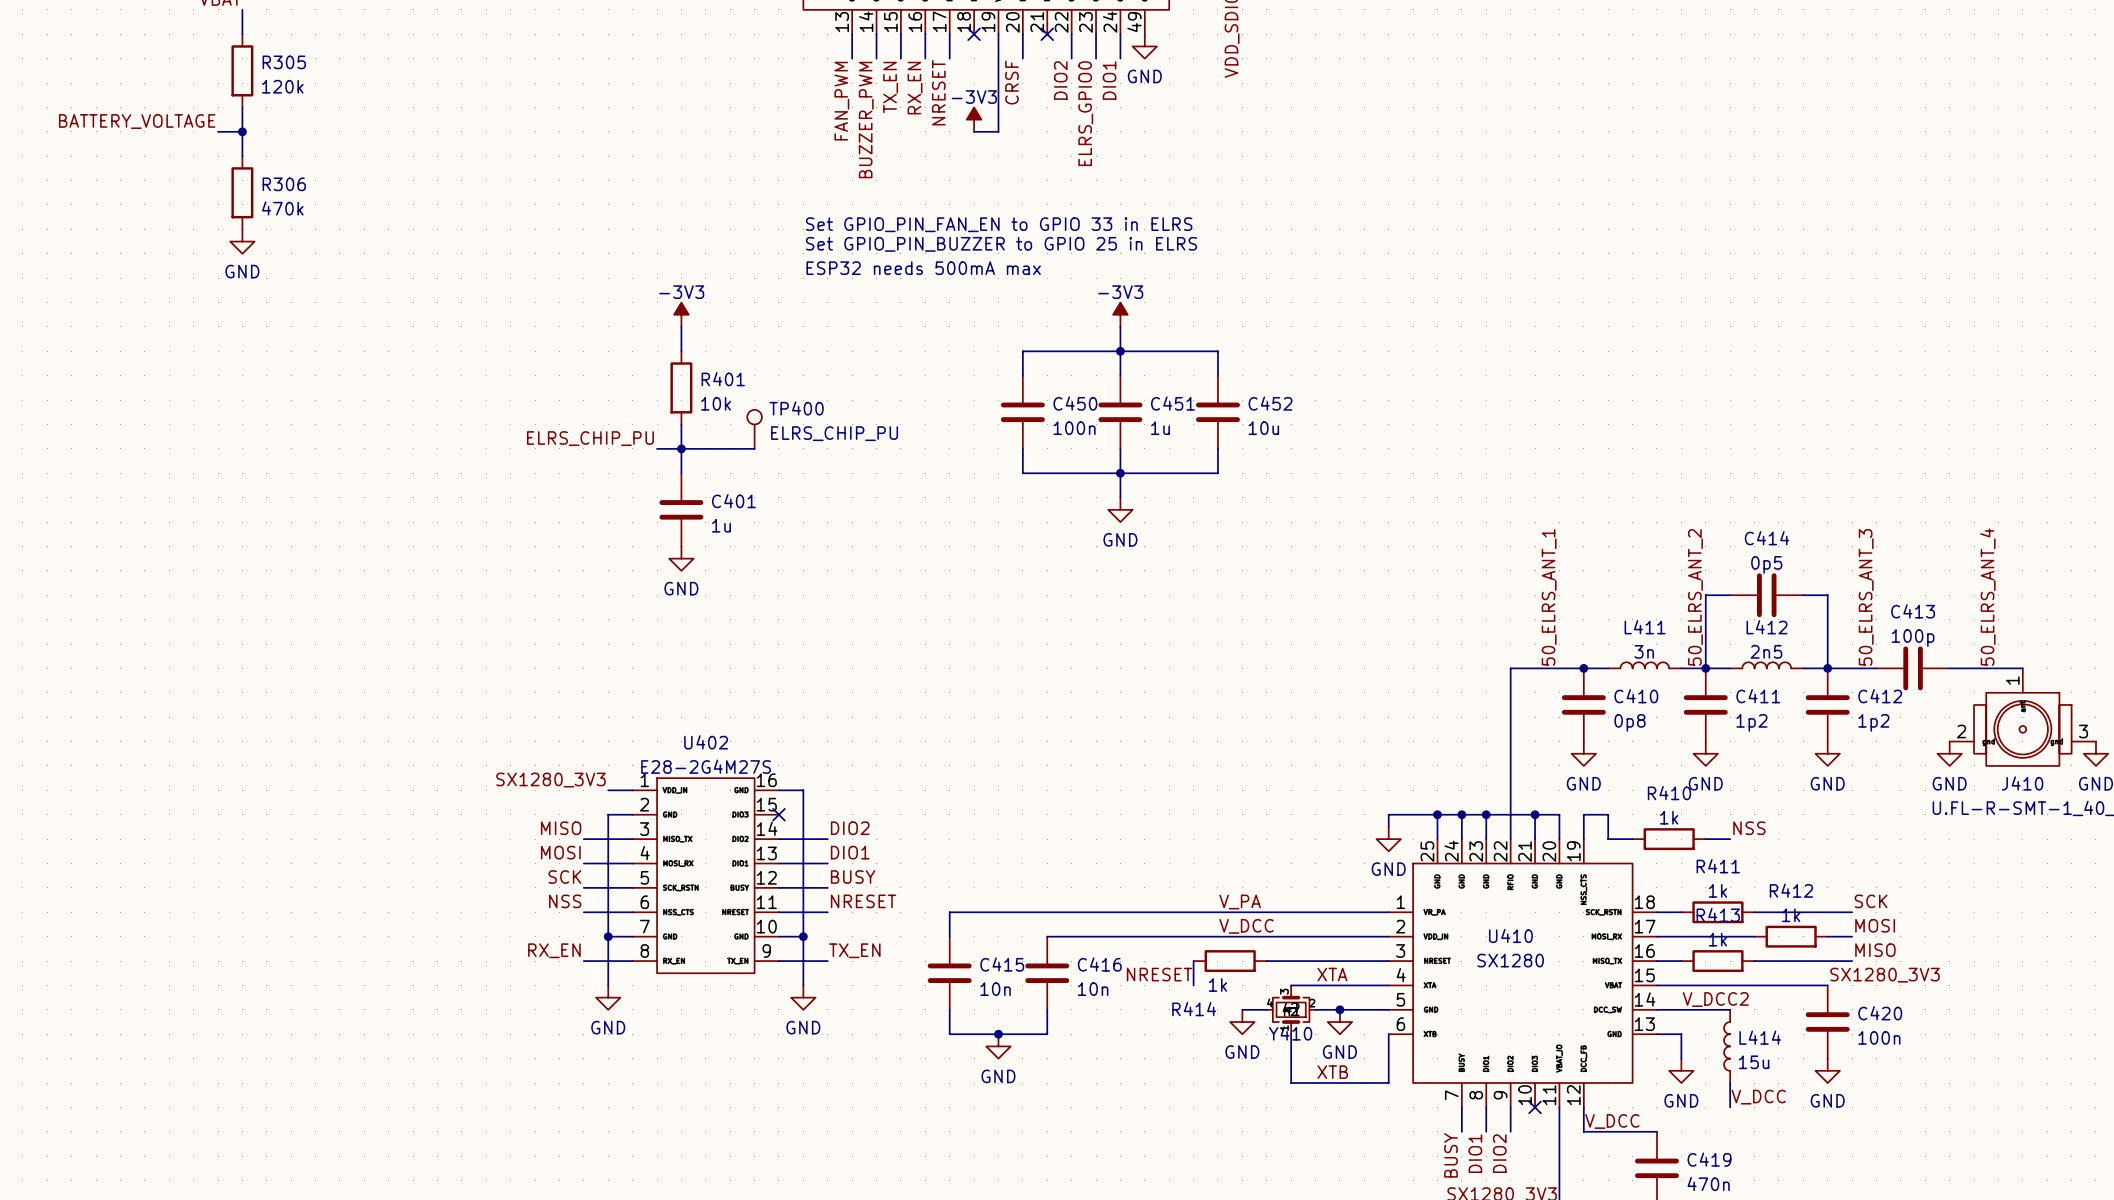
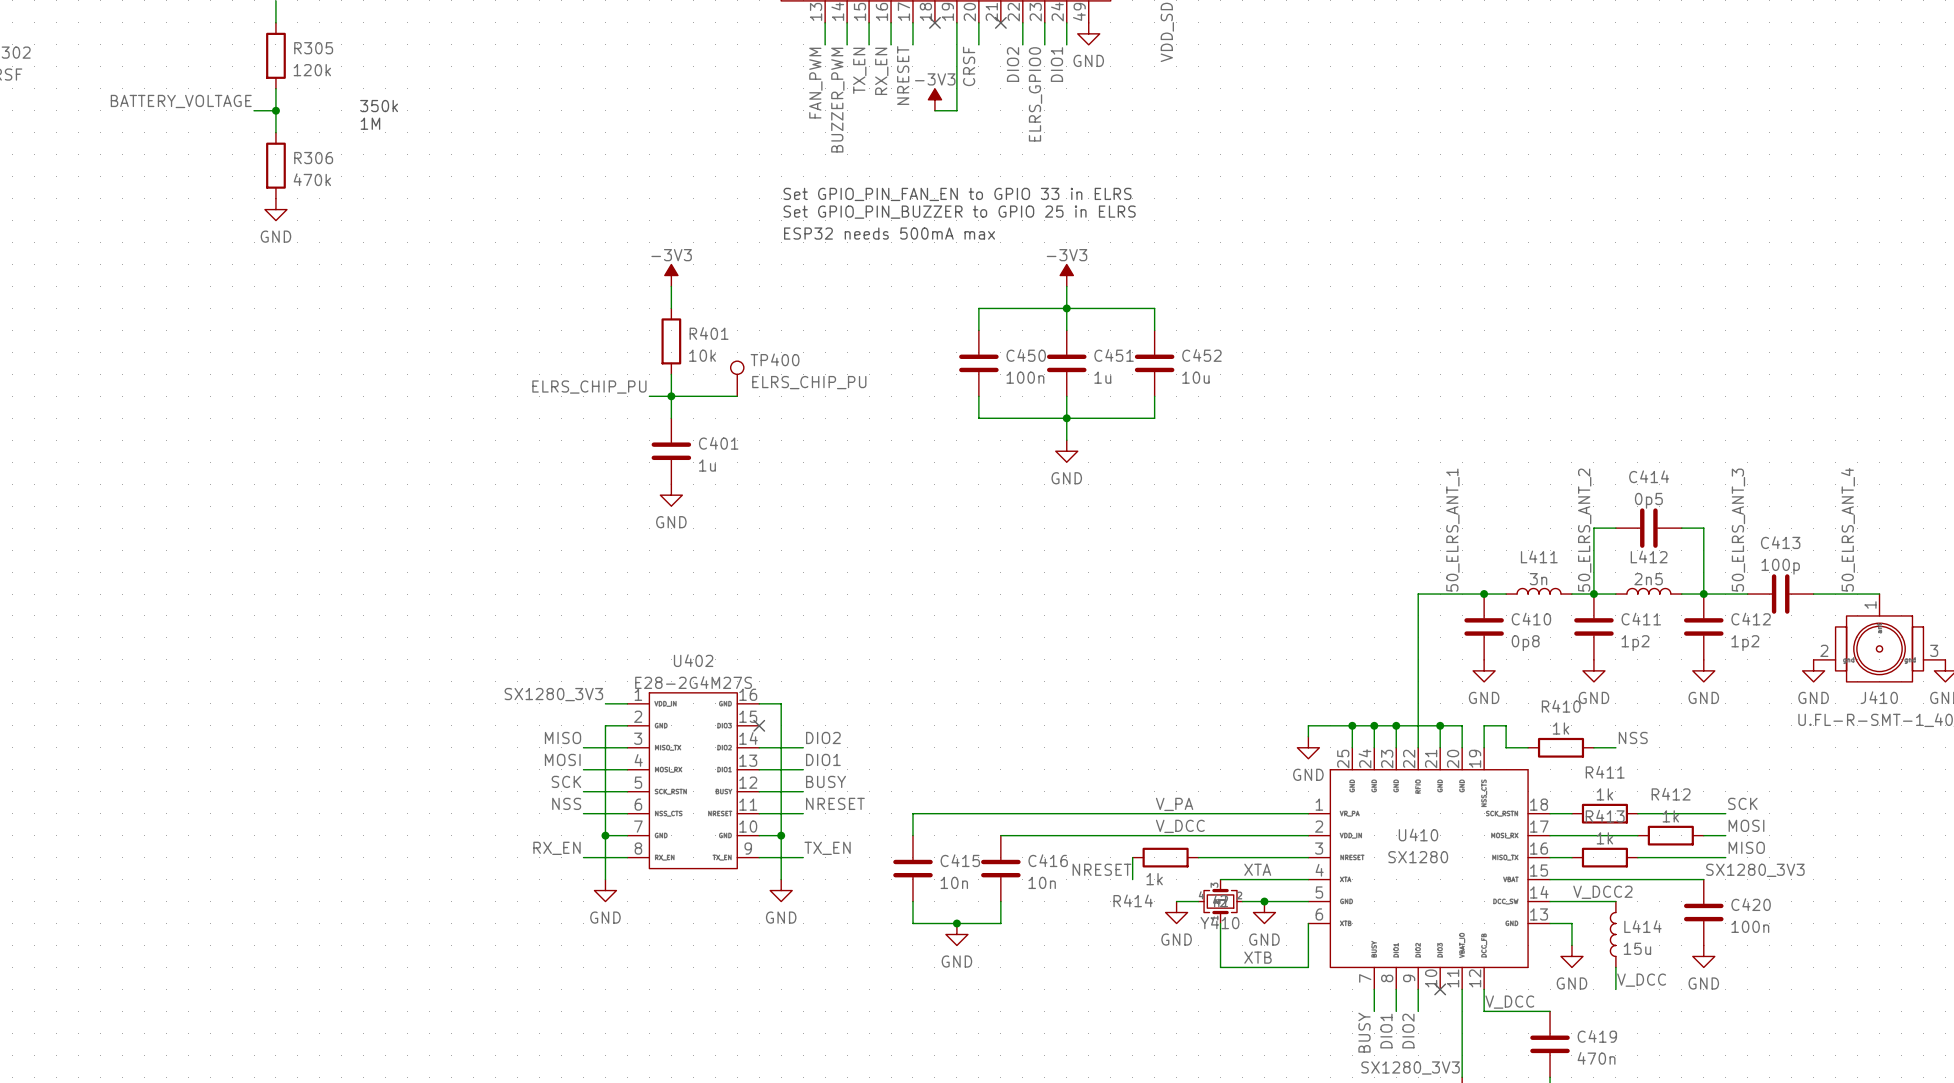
text: none -> 350k (379, 106)
text: none -> 1M (370, 123)

